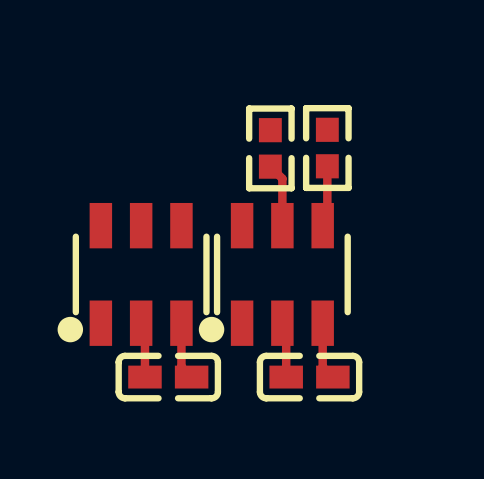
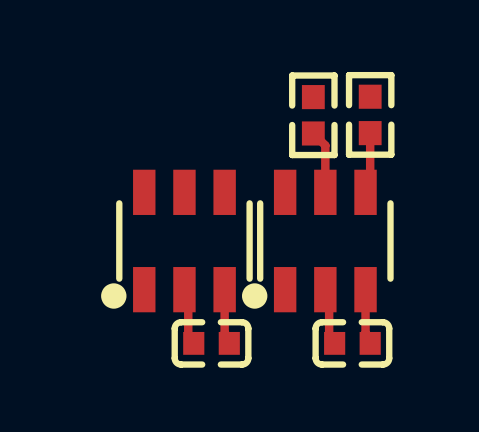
part footprint: [115, 352, 222, 402] -> [171, 319, 252, 368]
part footprint: [256, 352, 363, 402] -> [312, 319, 393, 368]

